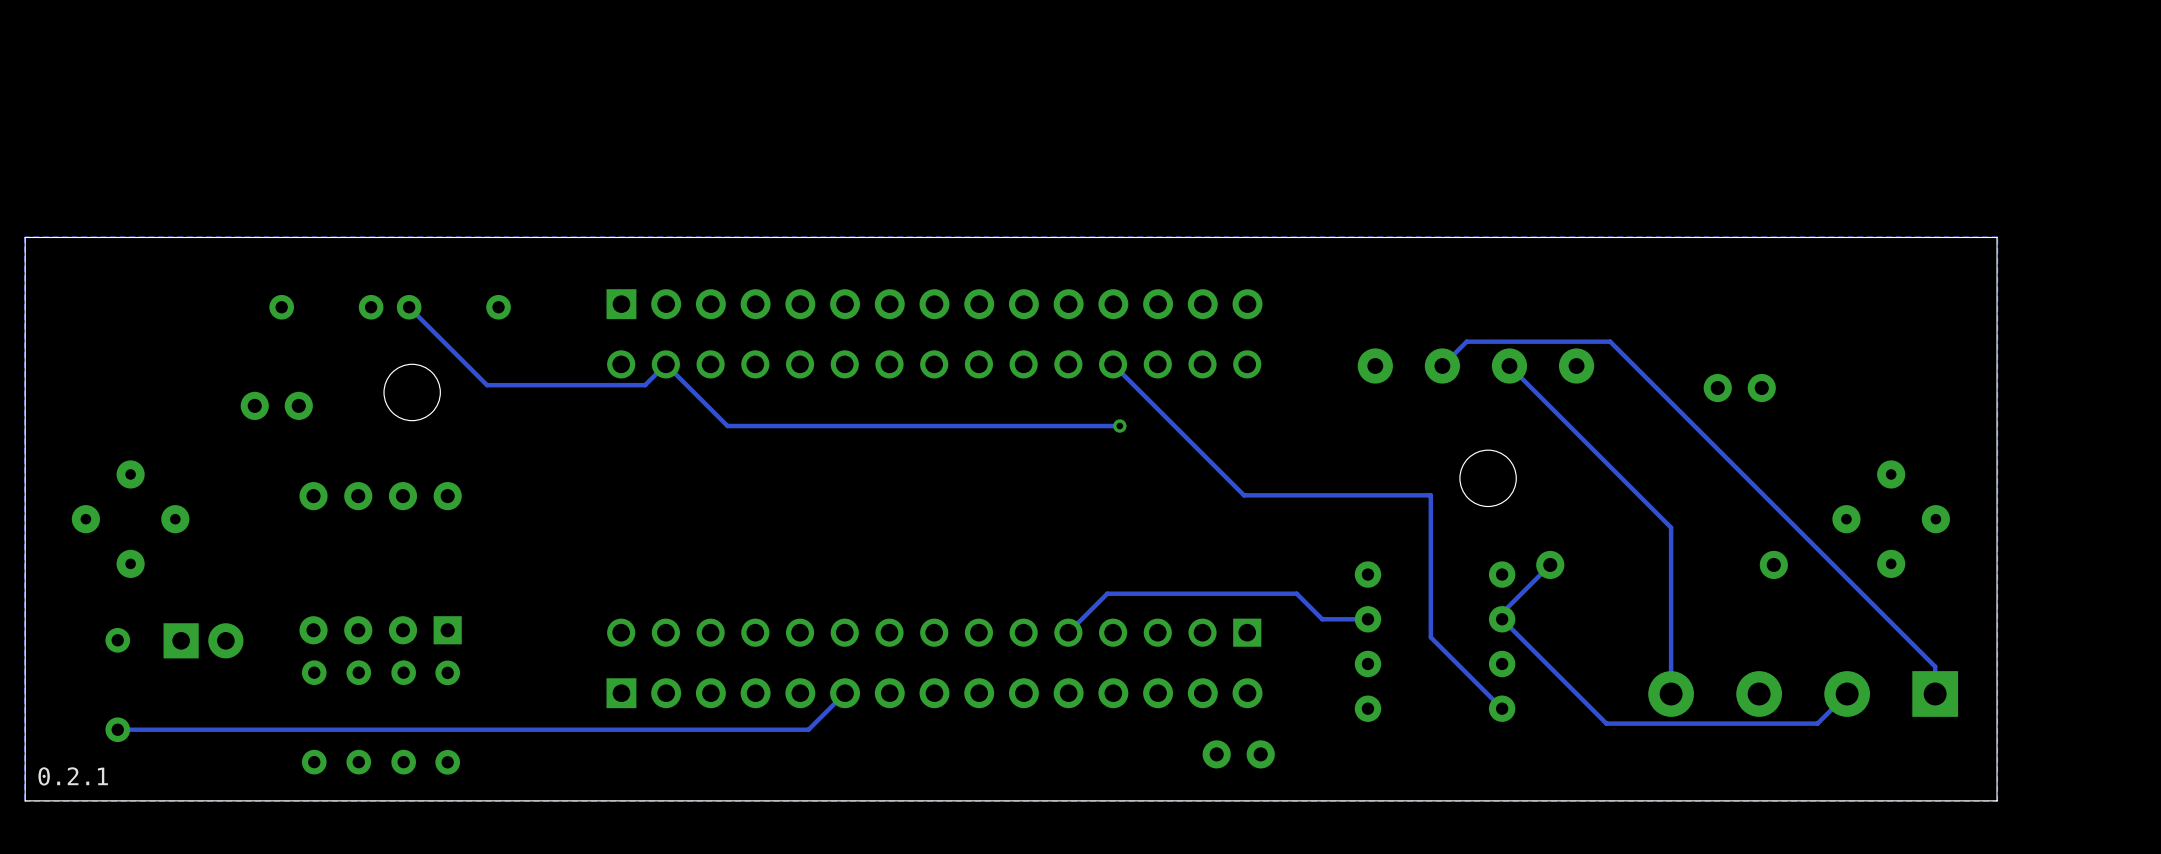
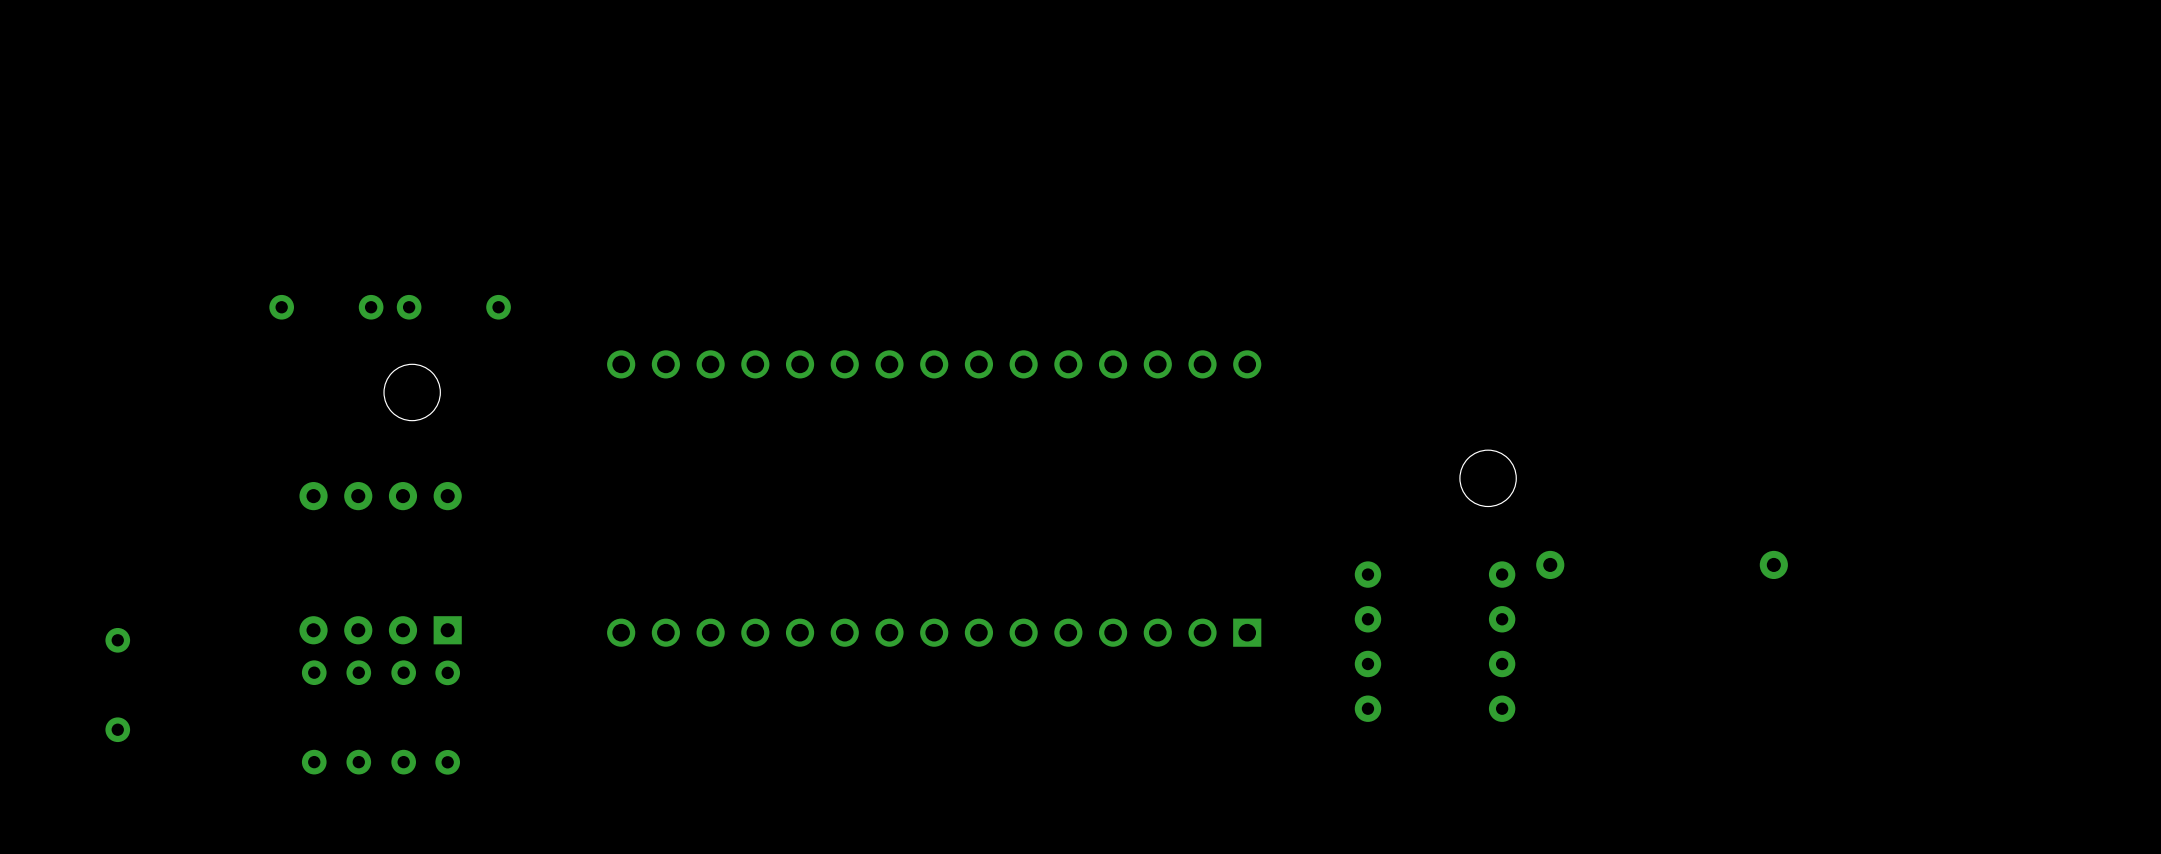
zone outline: (1997, 236) (1997, 801) (24, 801) (24, 236) (1997, 236) -> none
board edge: (1997, 237) (25, 237) (25, 800) (1997, 800) (1997, 237) -> none
part: (934, 304) -> none
track: (409, 307) (487, 385) (645, 385) (665, 364) (727, 426) (1119, 426) -> none
track: (1113, 364) (1244, 495) (1430, 495) (1430, 637) (1502, 708) -> none
track: (1442, 366) (1466, 341) (1610, 341) (1935, 666) (1935, 693) -> none
part: (1475, 366) -> none
track: (1509, 366) (1671, 527) (1671, 693) -> none
part: (1739, 388) -> none
part: (276, 405) -> none
via: (1119, 426) -> none
part: (130, 519) -> none
part: (1891, 519) -> none
track: (1550, 564) (1502, 613) (1502, 619) (1606, 723) (1817, 723) (1847, 693) -> none
track: (1367, 619) (1322, 619) (1296, 593) (1107, 593) (1068, 632) -> none
part: (203, 640) -> none
track: (845, 693) (808, 729) (117, 729) -> none
part: (934, 693) -> none
part: (1803, 693) -> none
part: (1238, 754) -> none
text: 0.2.1 (73, 776) -> none

